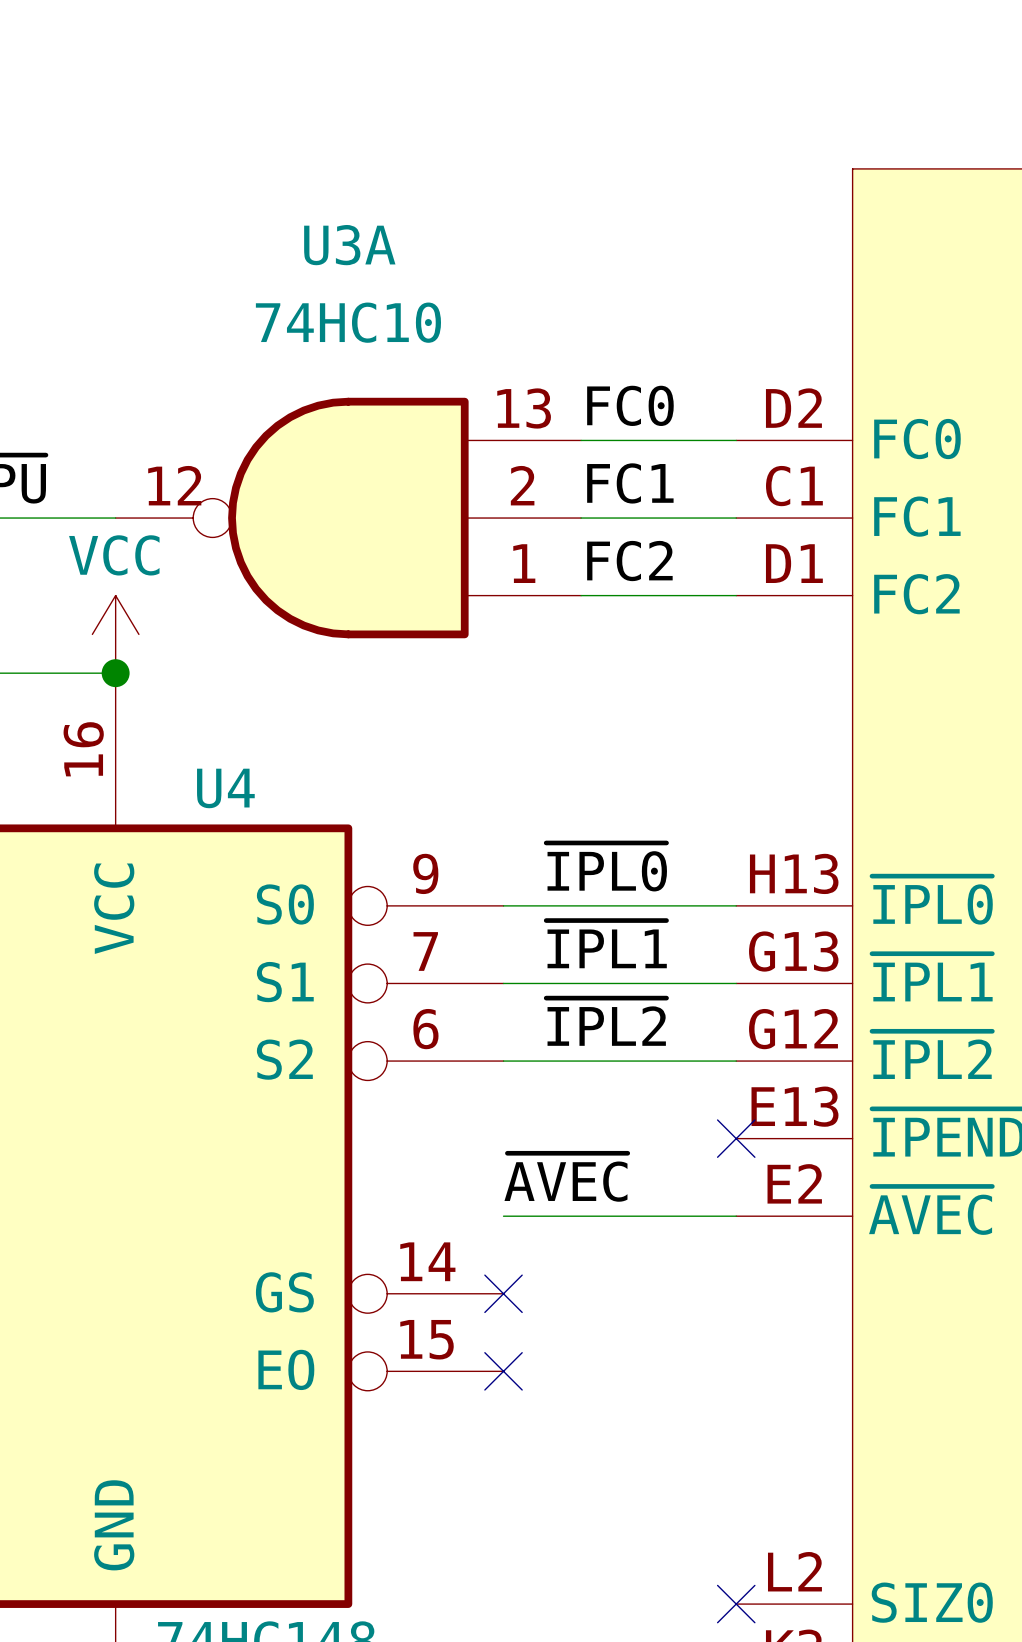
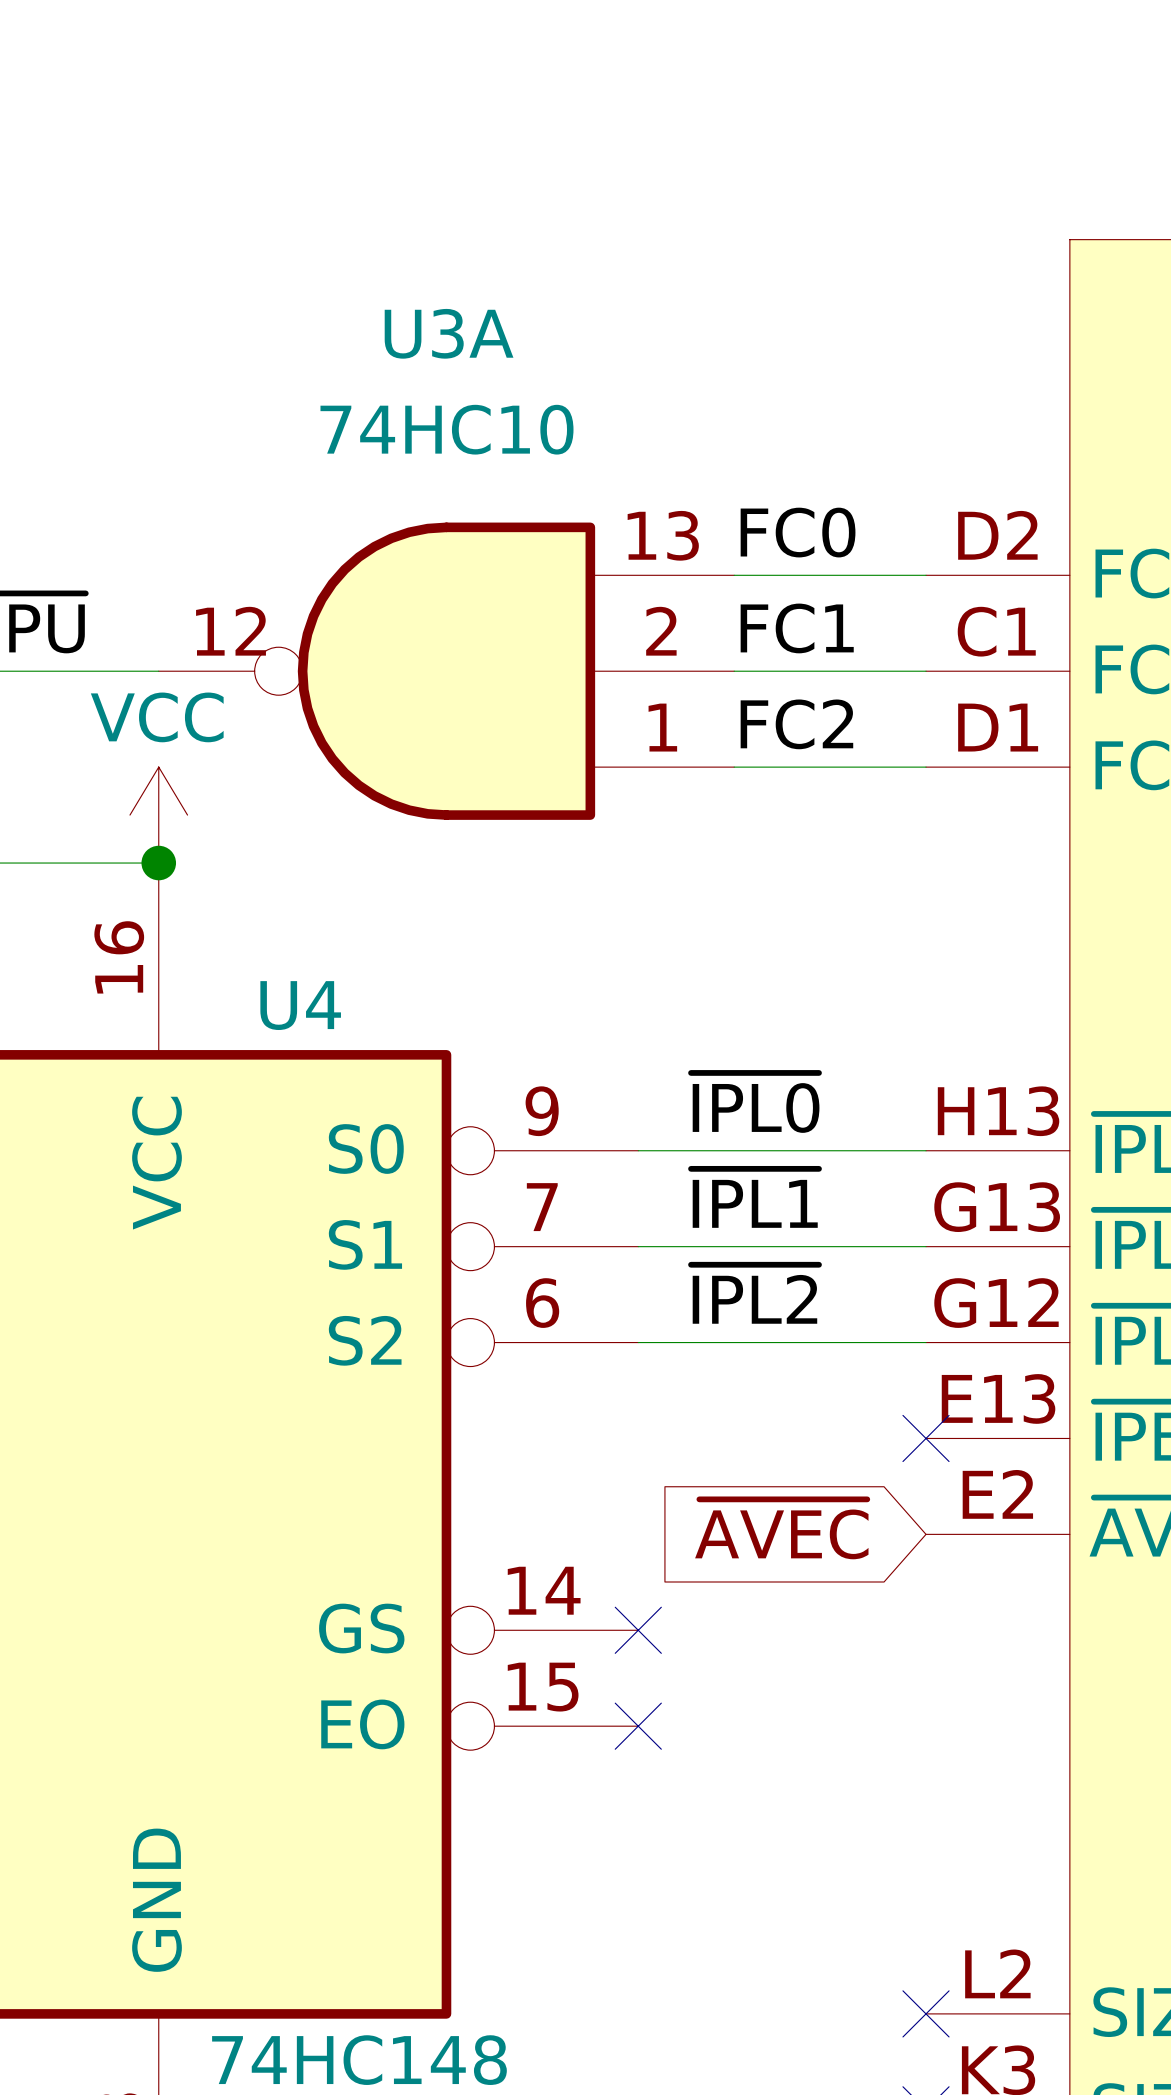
label: ~{AVEC} (566, 1177) -> none
global label: none -> ~{AVEC} (781, 1529)
wire: (503, 1216) (736, 1216) -> none

